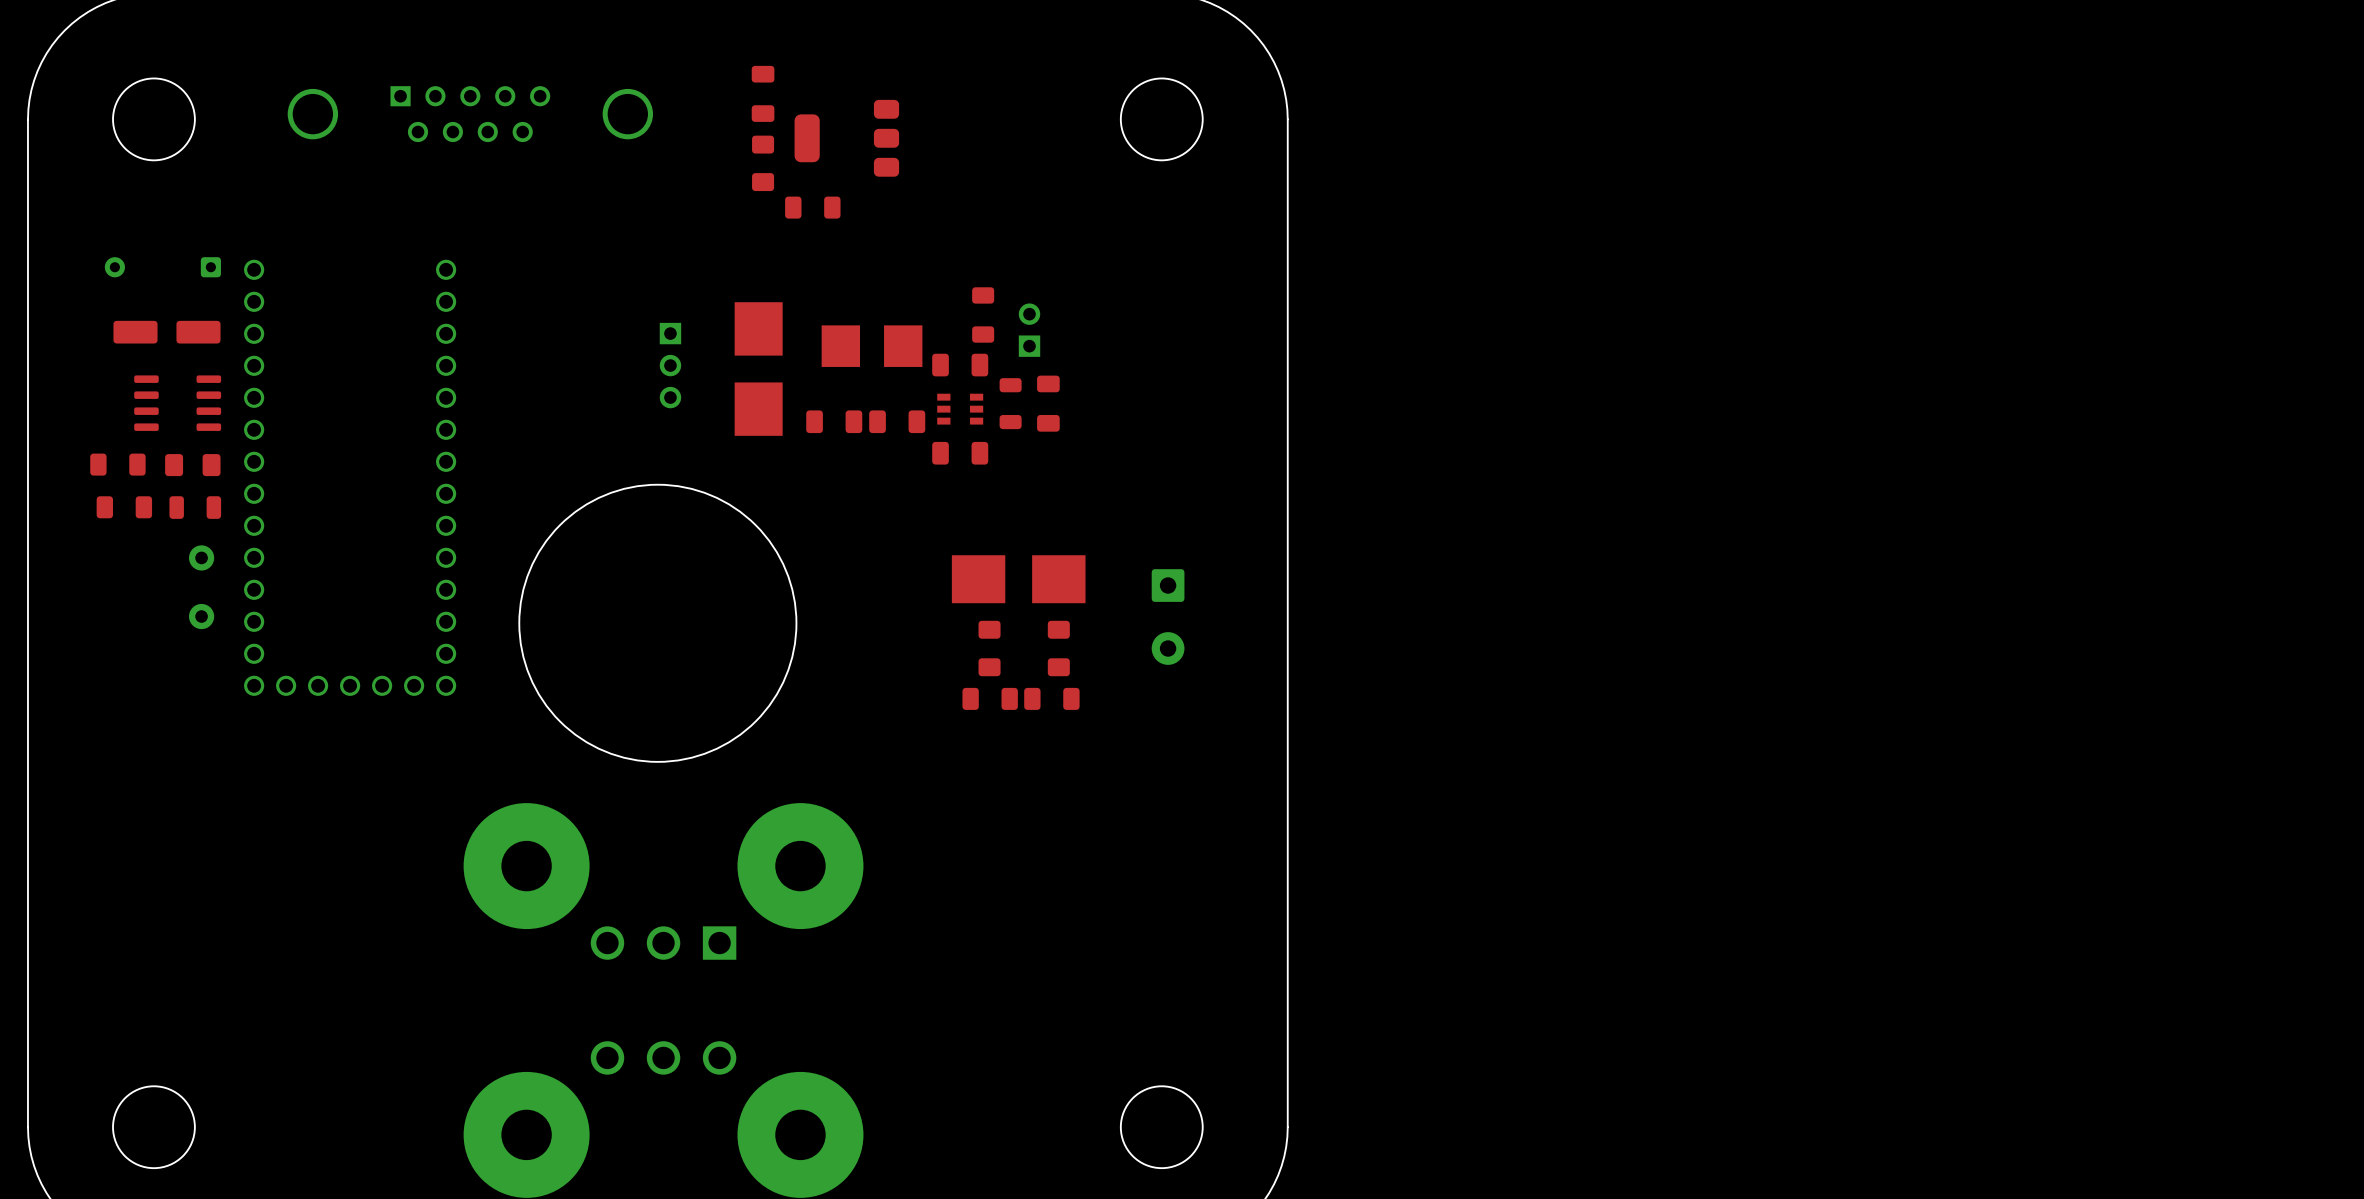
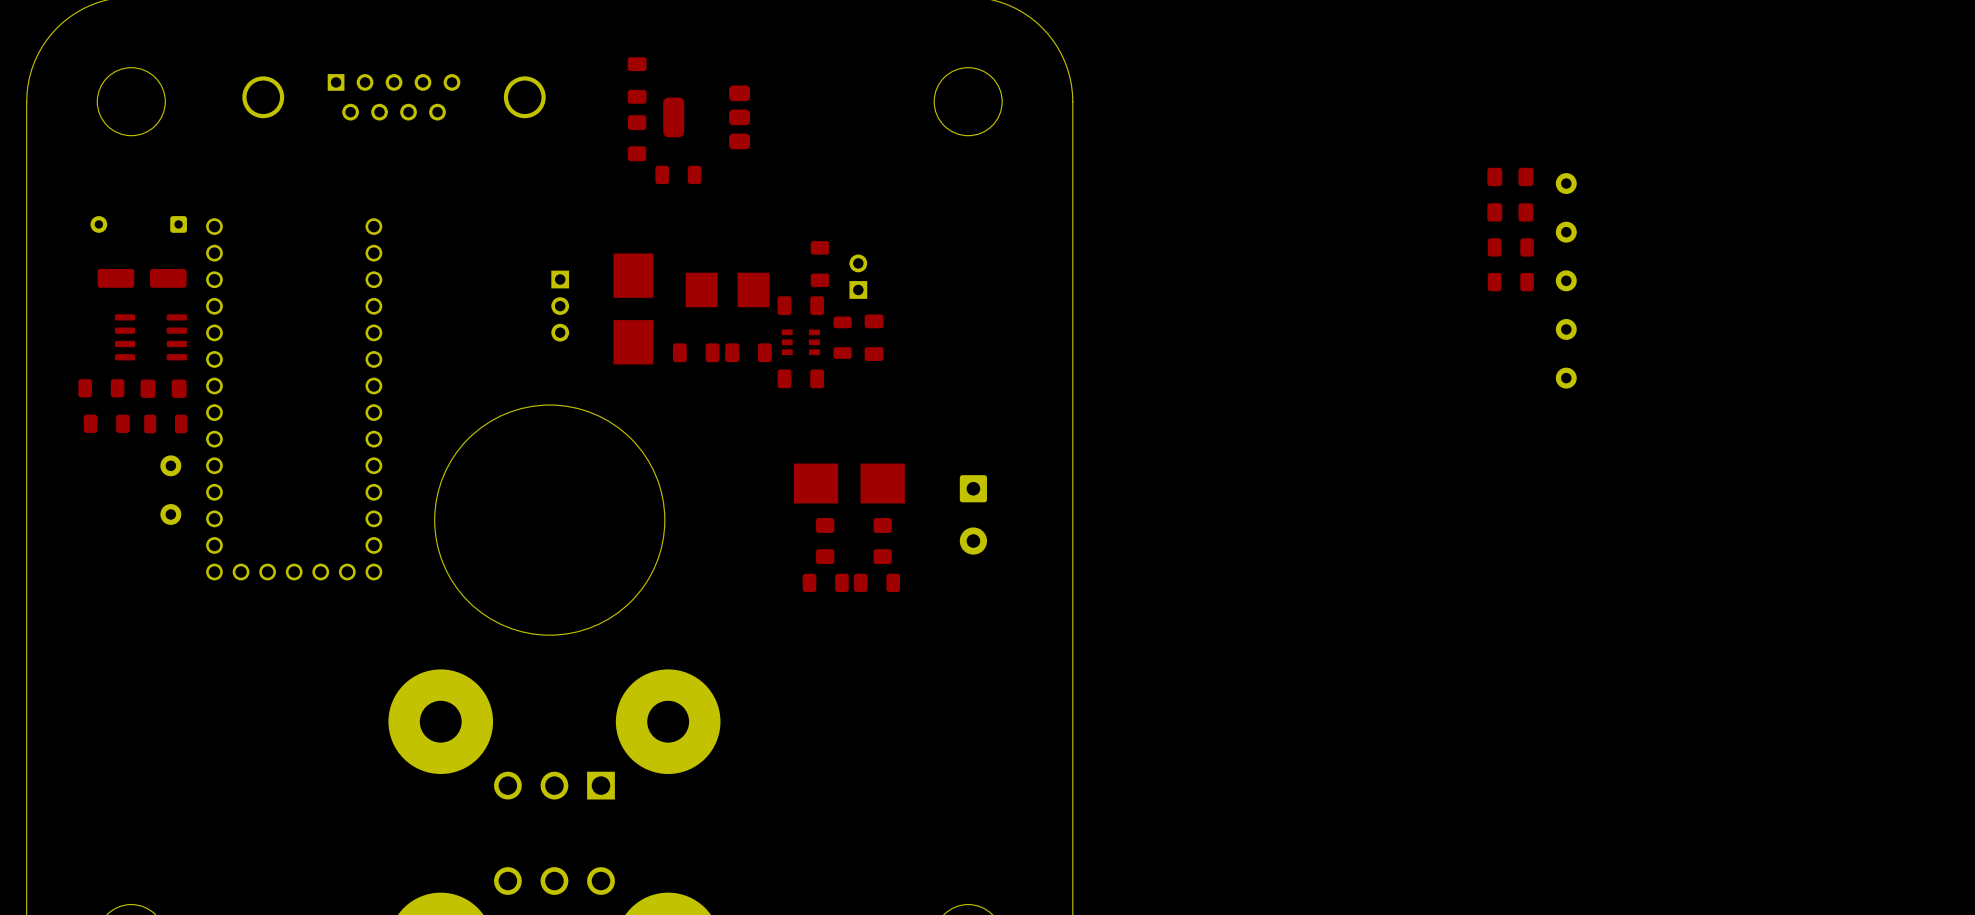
part: none -> (1510, 176)
part: none -> (1566, 183)
part: none -> (1510, 212)
part: none -> (1566, 232)
part: none -> (1510, 247)
part: none -> (1566, 280)
part: none -> (1510, 282)
part: none -> (1566, 329)
part: none -> (1566, 378)

